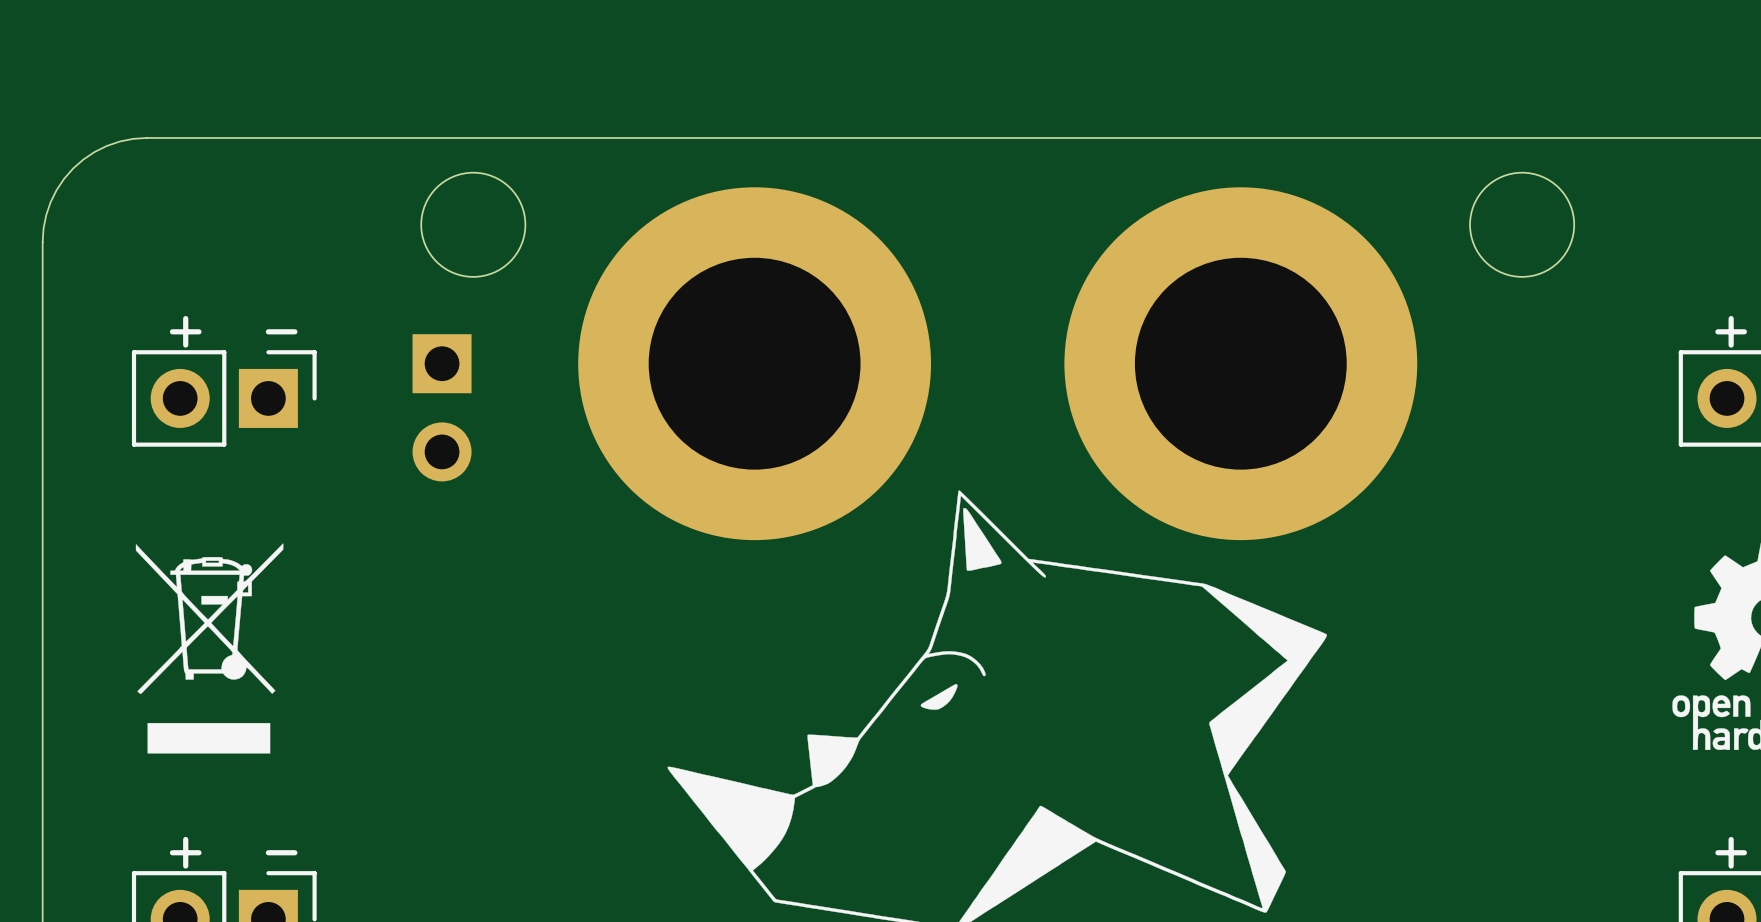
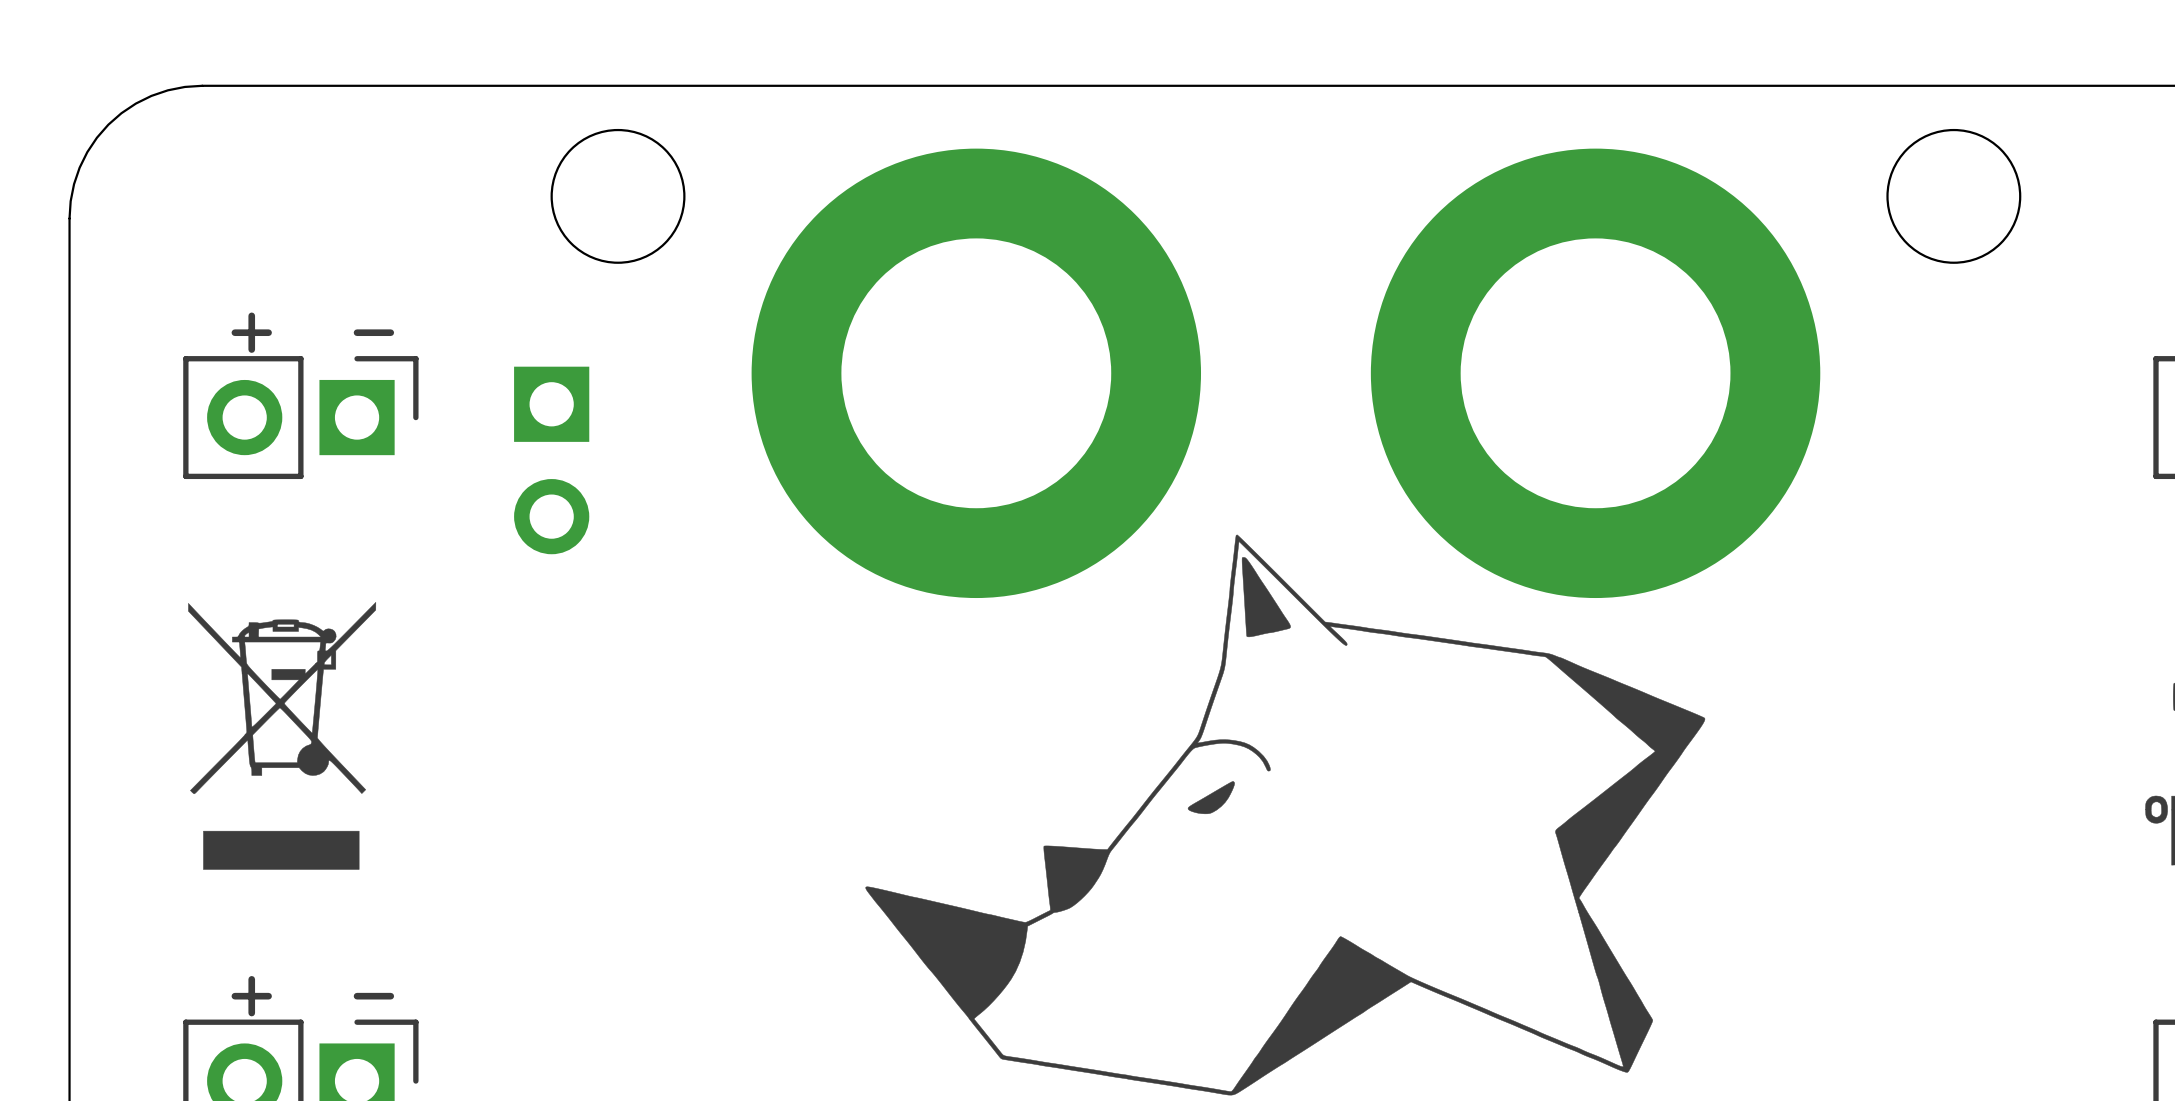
part position: (442, 407) -> (551, 460)

